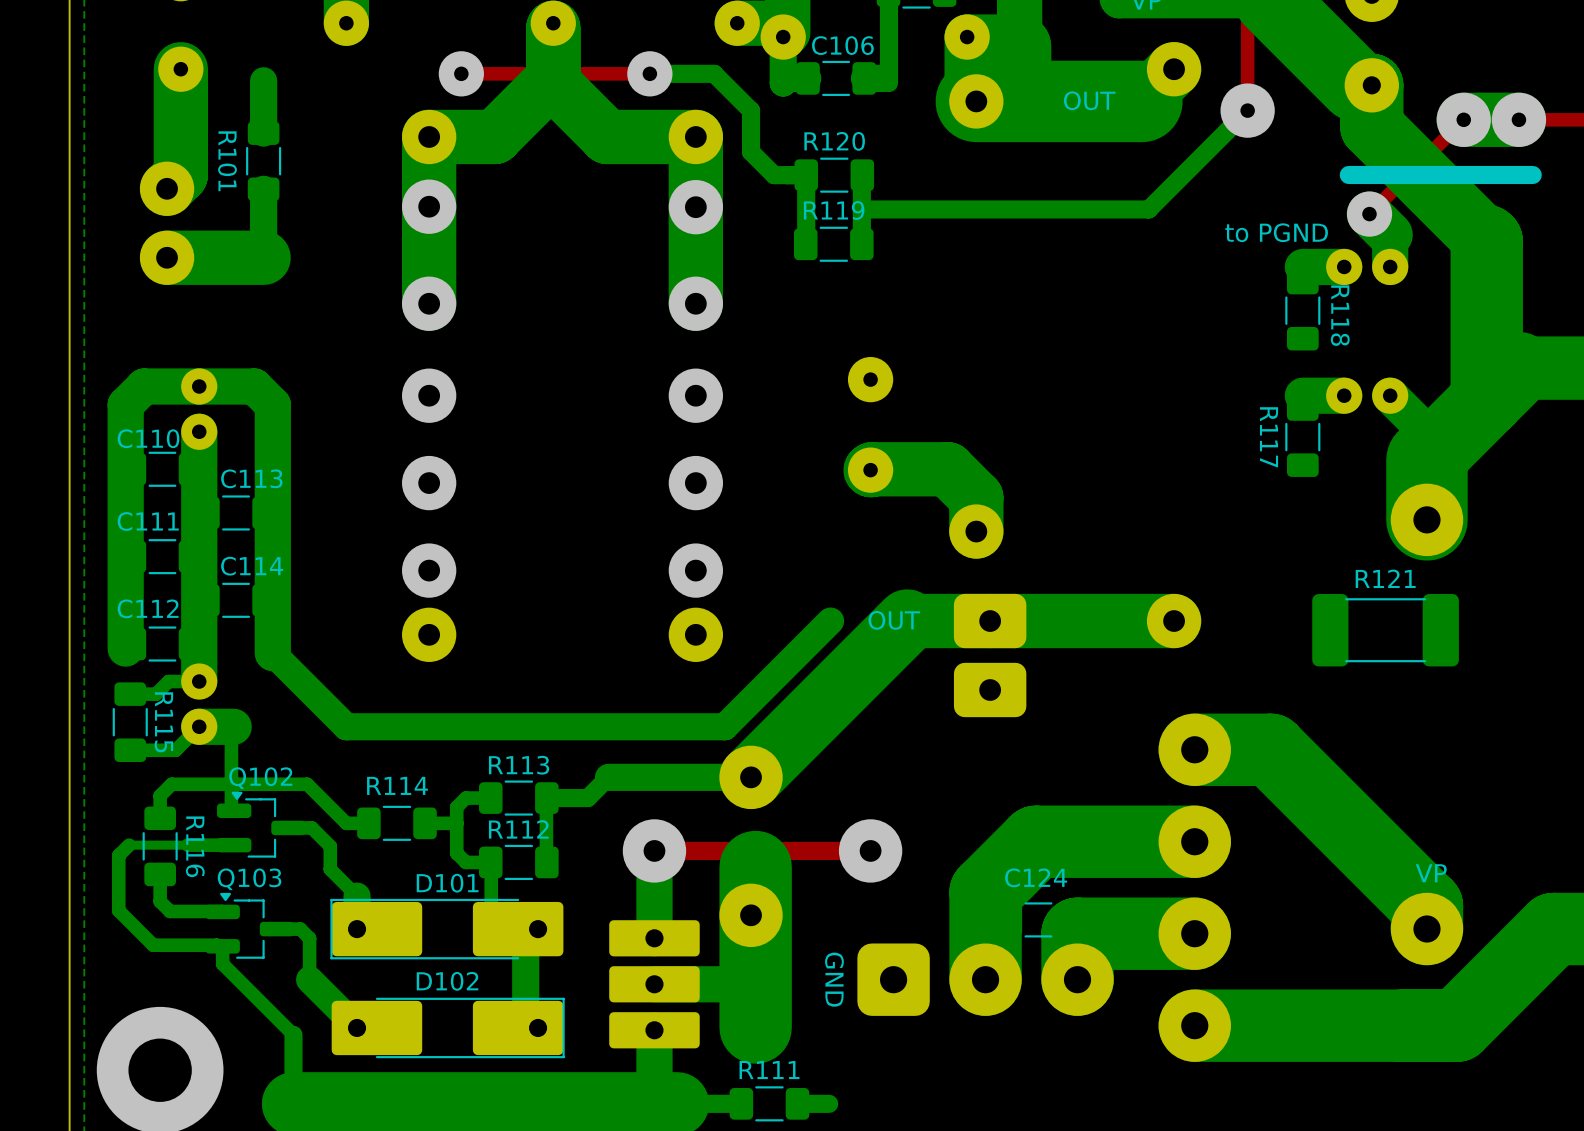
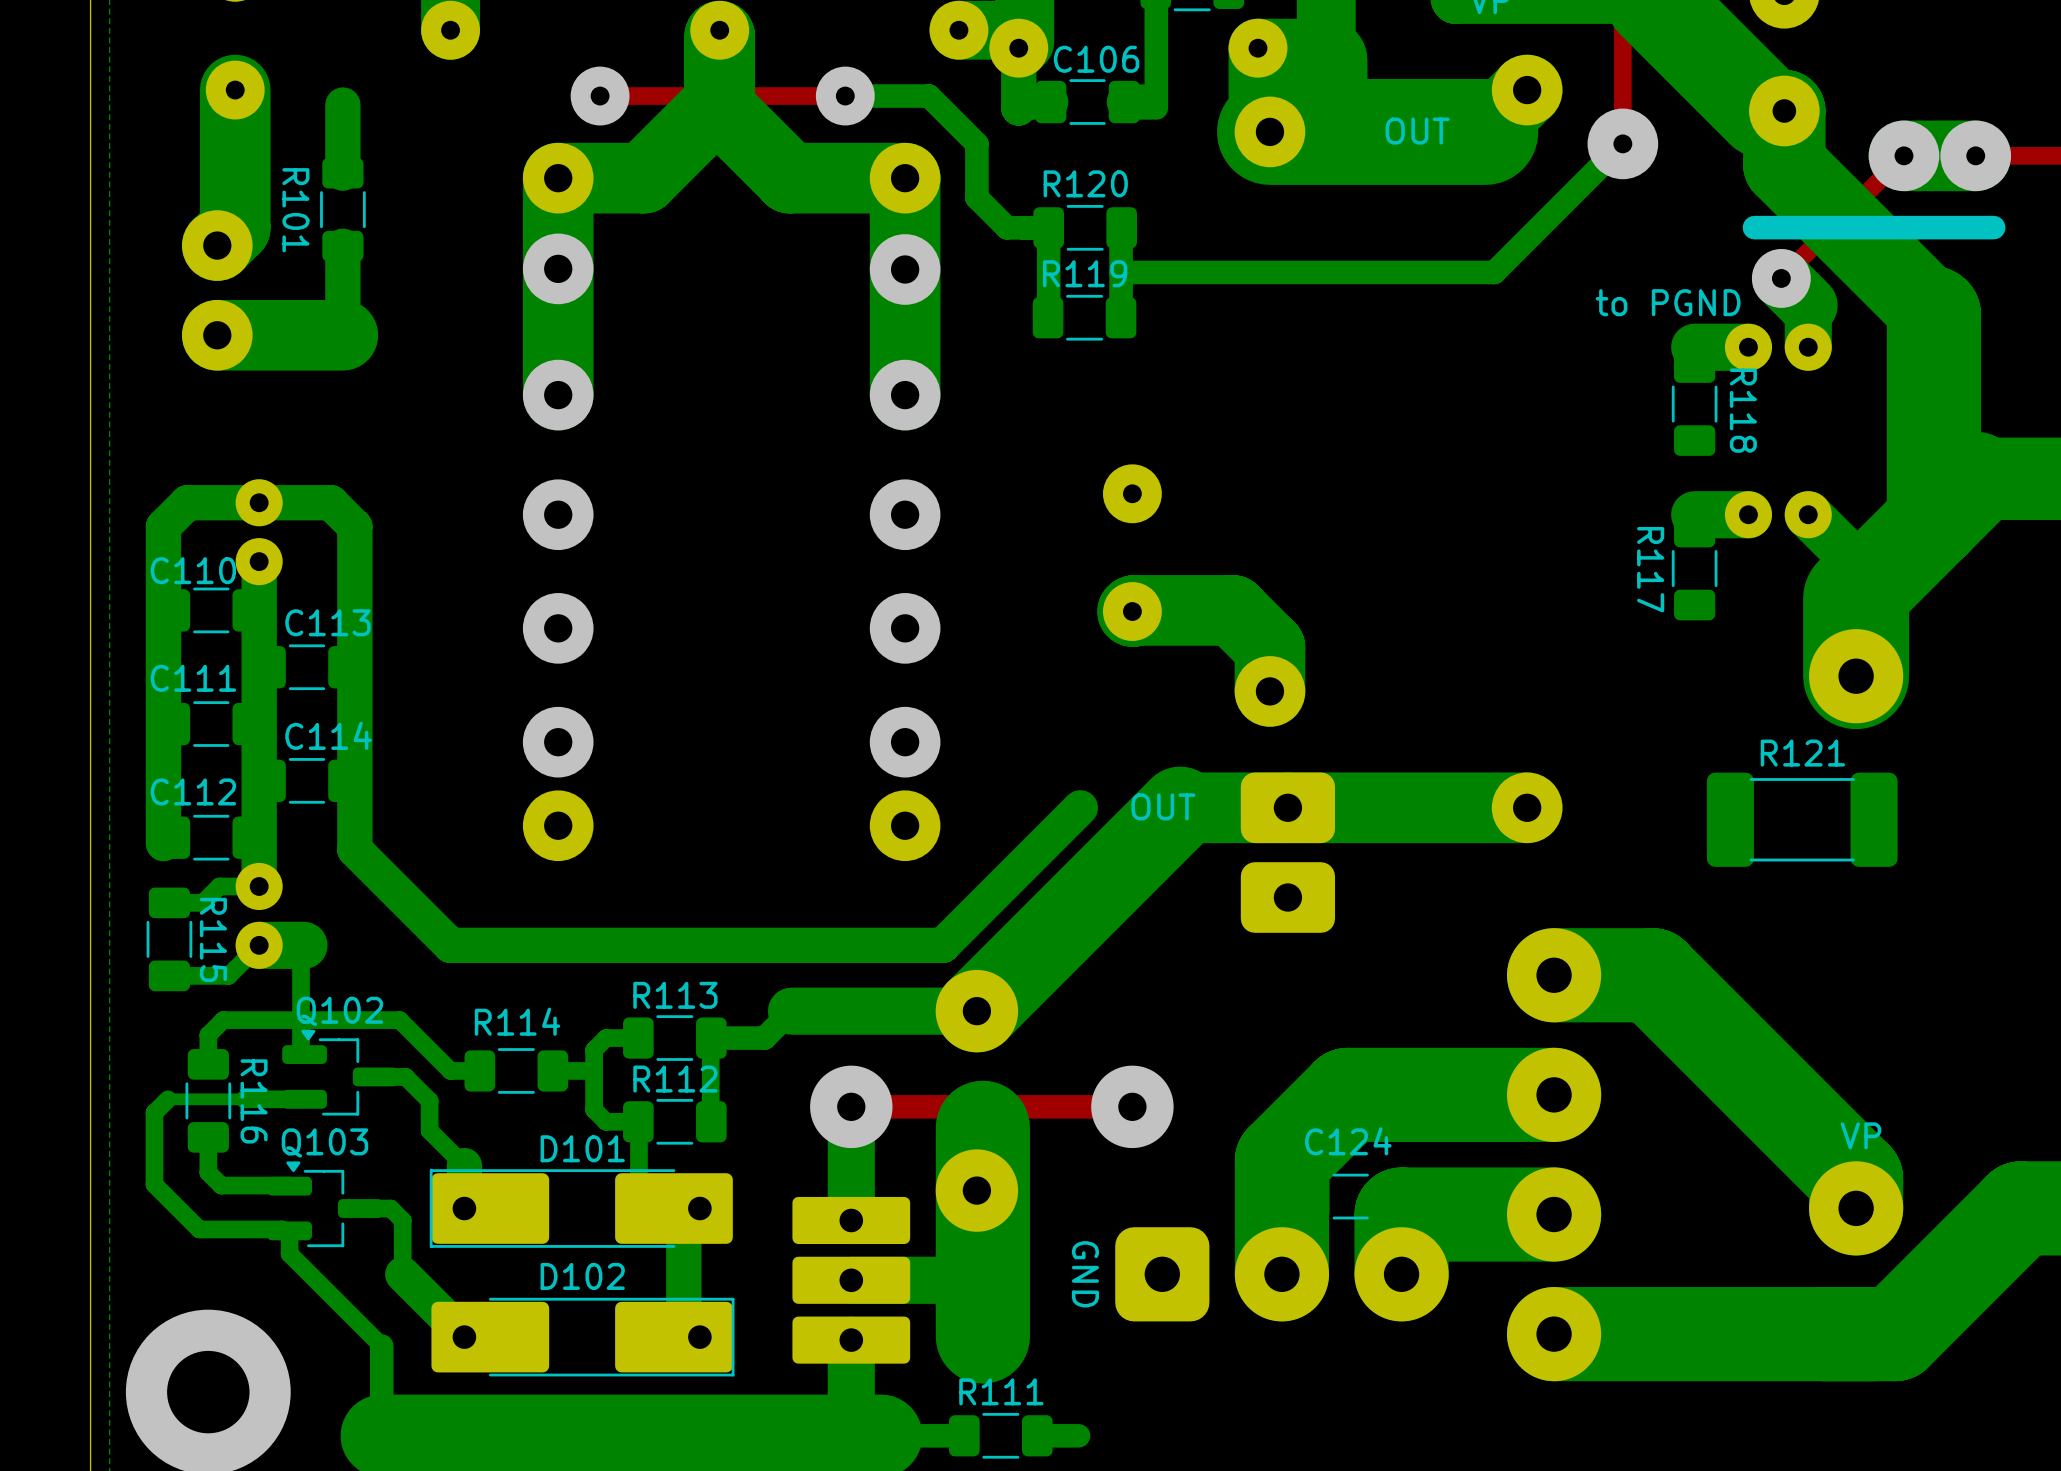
bottom track width: thick (199, 431) (199, 680) -> thin (259, 561) (259, 885)
bottom track width: thick (125, 648) (125, 404) (144, 386) (254, 386) (272, 404) (272, 653) -> thin (163, 843) (163, 526) (187, 502) (330, 502) (354, 526) (354, 849)
bottom track width: thin (751, 777) (608, 777) -> thick (976, 1011) (791, 1011)

